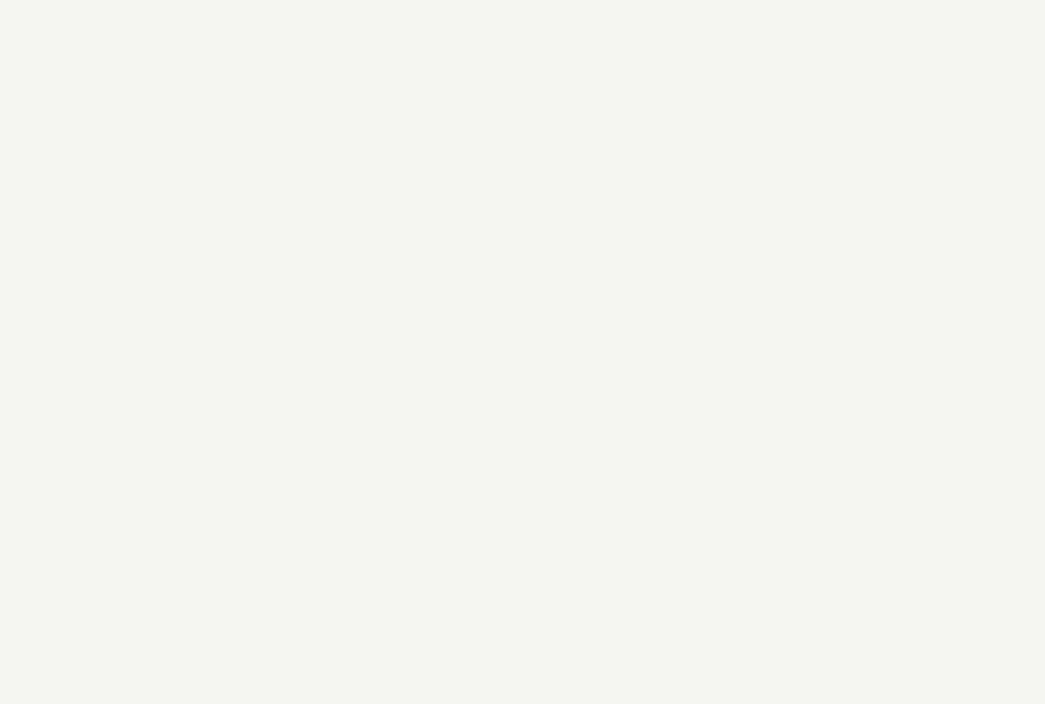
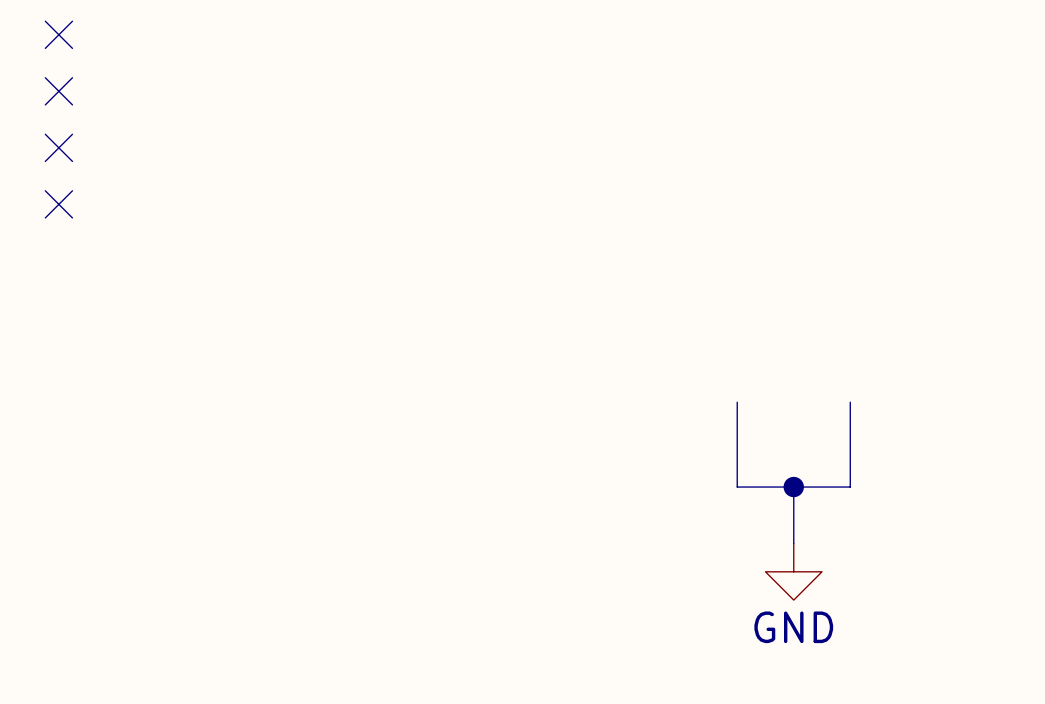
no-connect mark: none -> (58, 34)
no-connect mark: none -> (58, 91)
no-connect mark: none -> (58, 147)
no-connect mark: none -> (58, 204)
wire: none -> (737, 402) (737, 487) (850, 487) (850, 402)
wire: none -> (793, 487) (793, 543)
junction: none -> (793, 487)
power symbol: none -> GND (793, 571)

